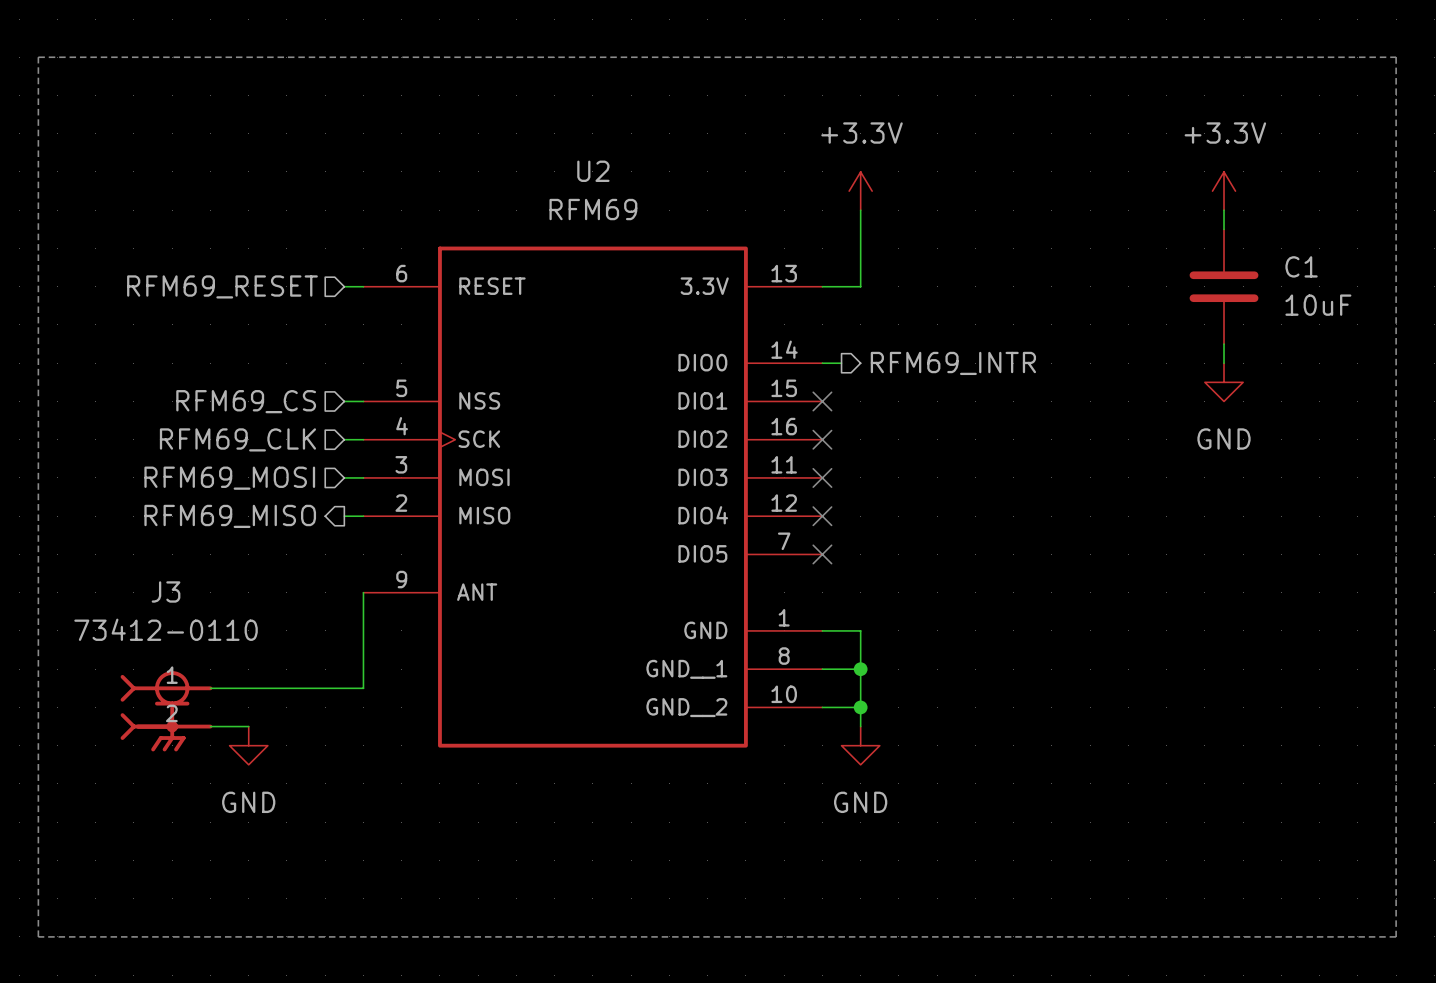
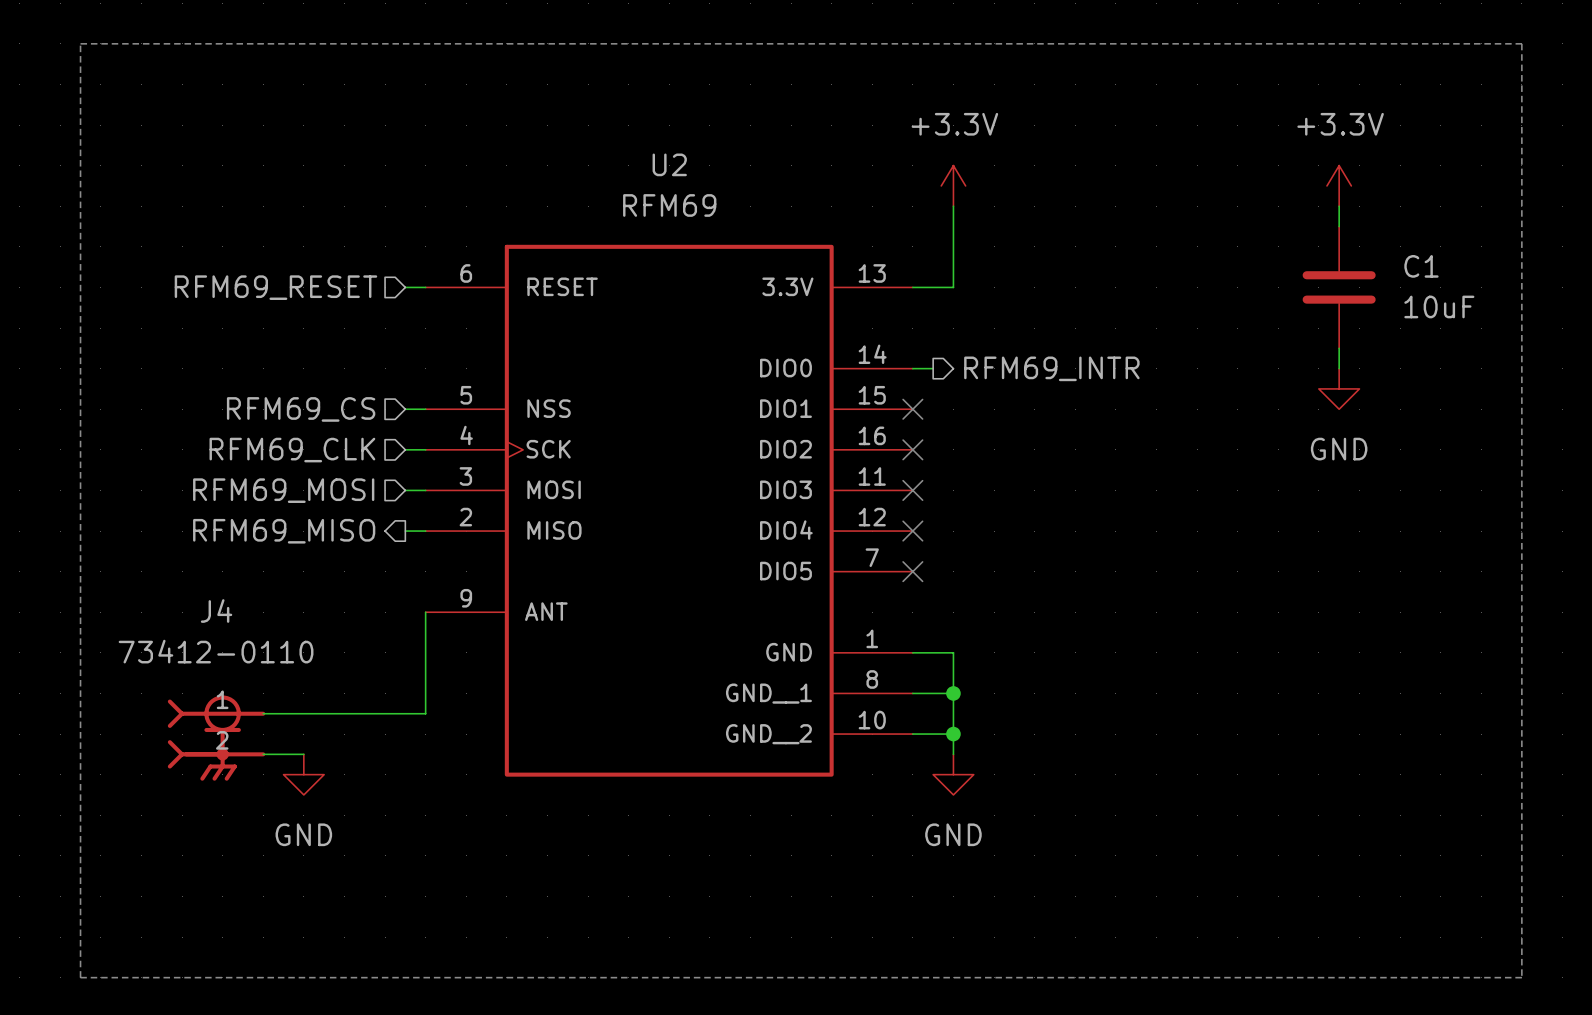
J3 name: J3 (166, 591) -> J4 (216, 611)

